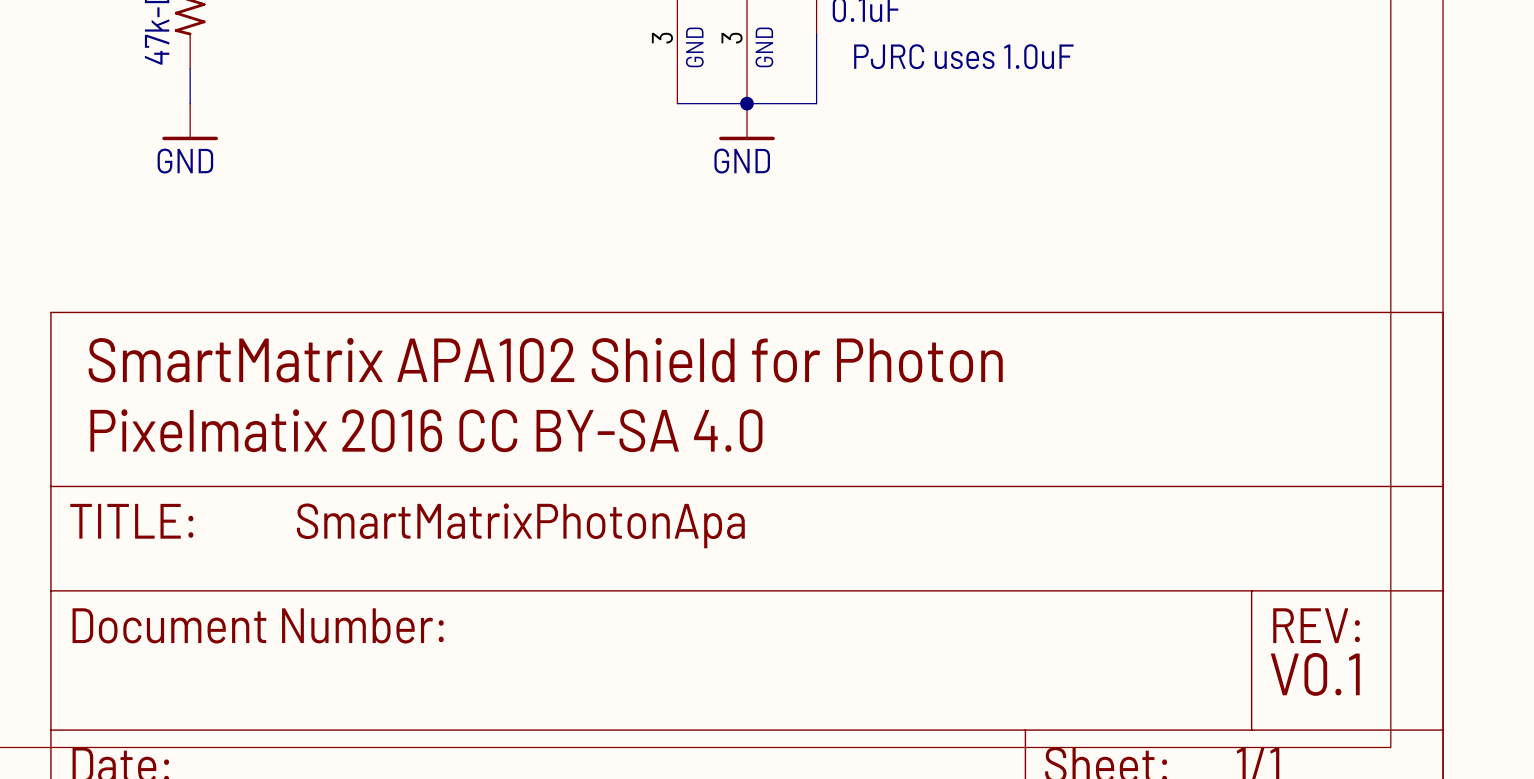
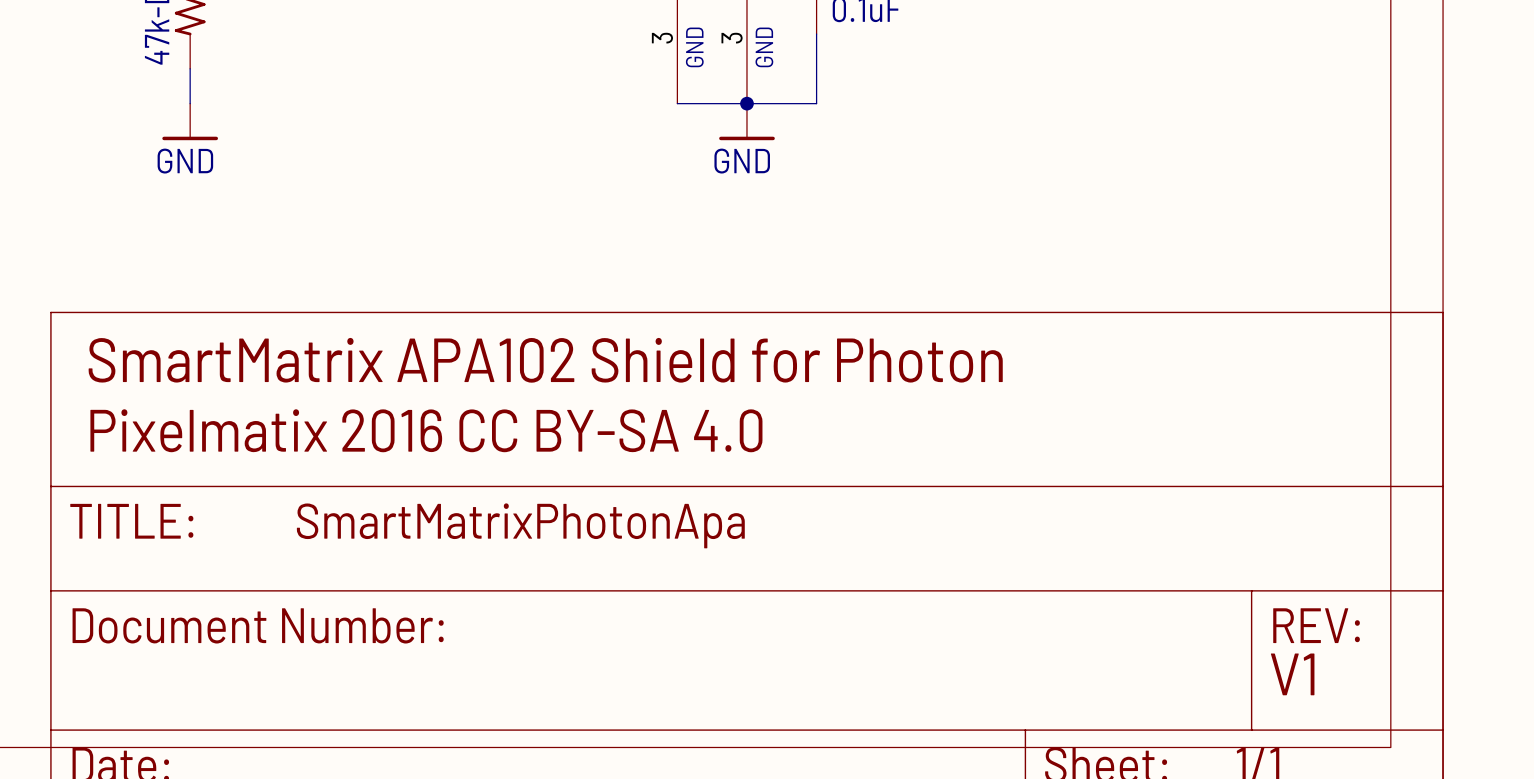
text: PJRC uses 1.0uF (963, 56) -> none
text: V0.1 (1315, 674) -> V1 (1292, 674)

